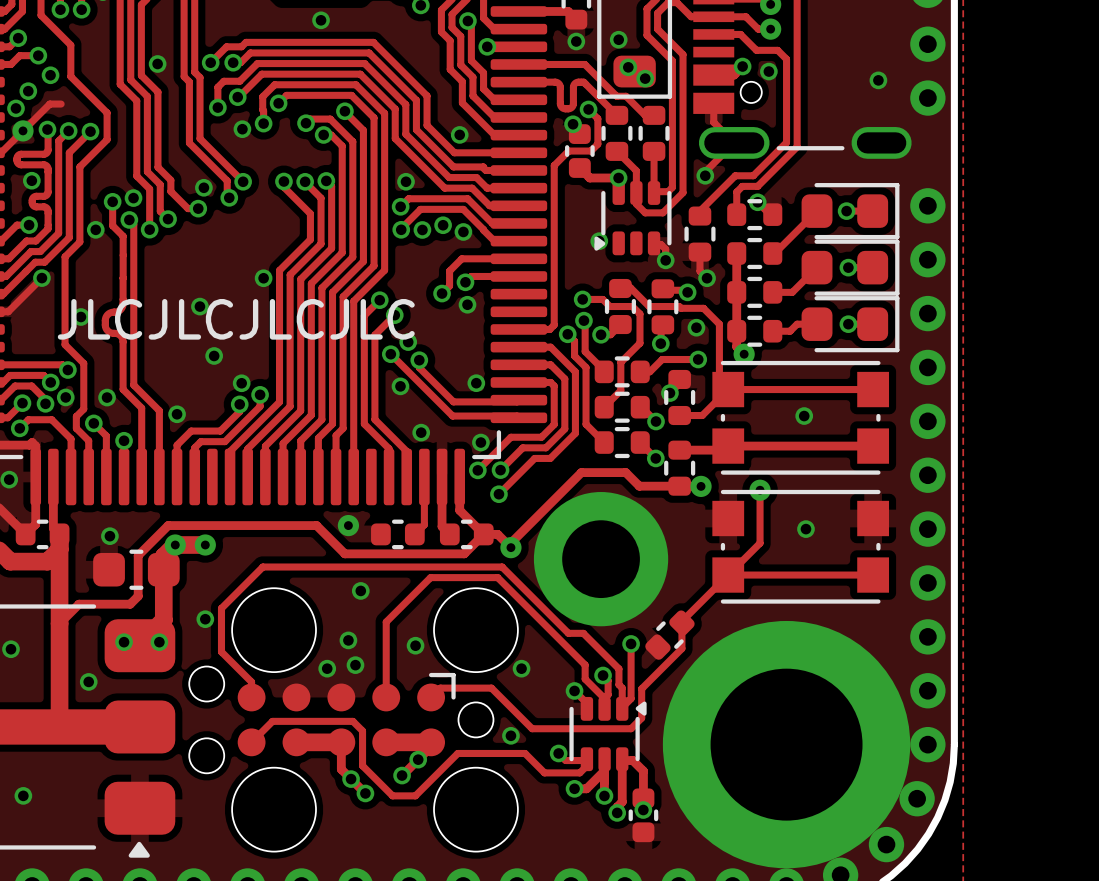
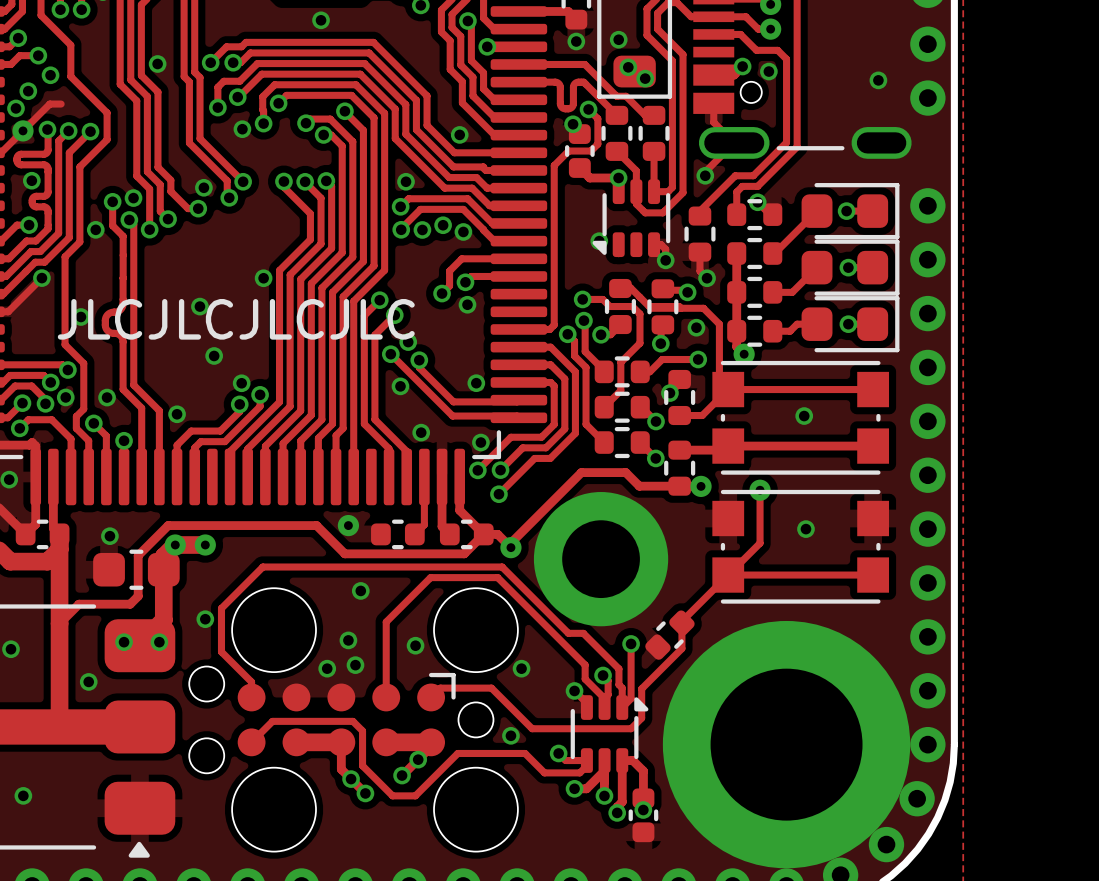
part footprint: [594, 181, 672, 256] -> [592, 179, 671, 258]
part footprint: [569, 696, 647, 772] -> [570, 695, 649, 773]

